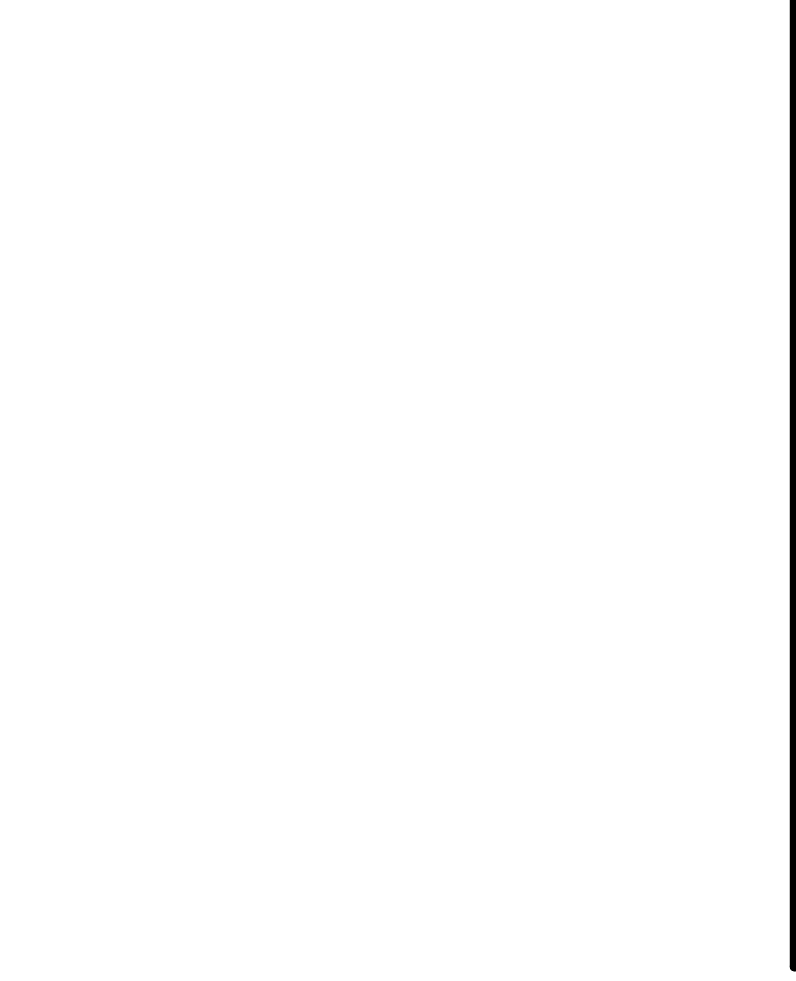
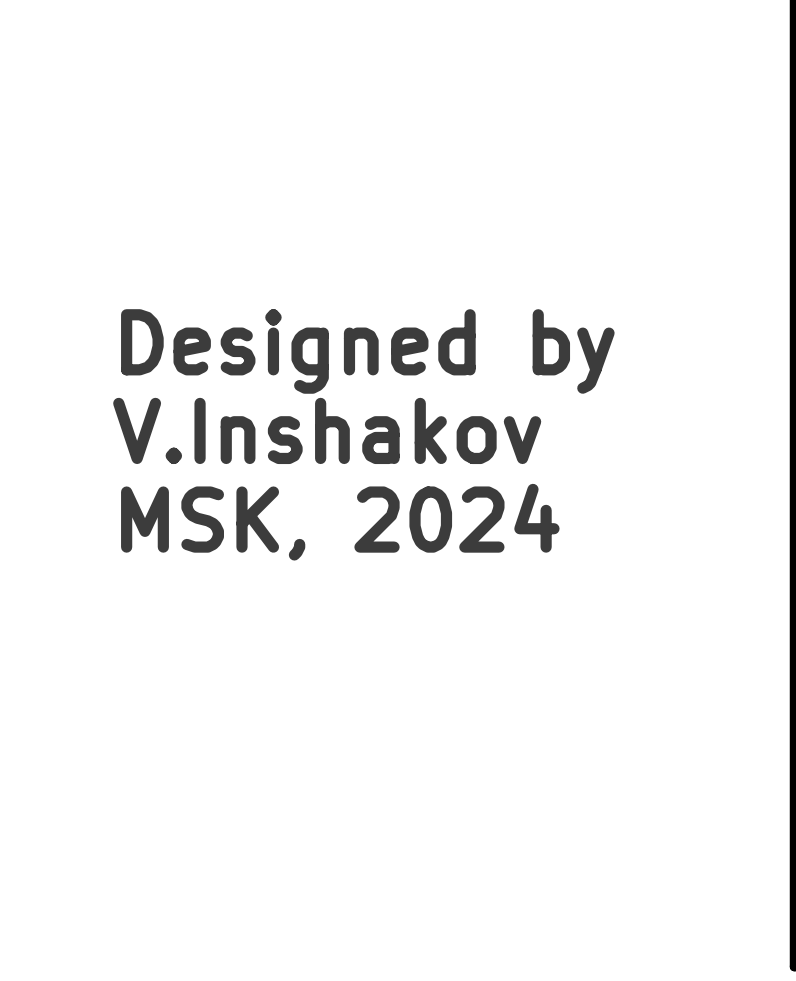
text: none -> Designed by (367, 351)
text: none -> V.Inshakov (327, 430)
text: none -> MSK, 2024 (340, 522)

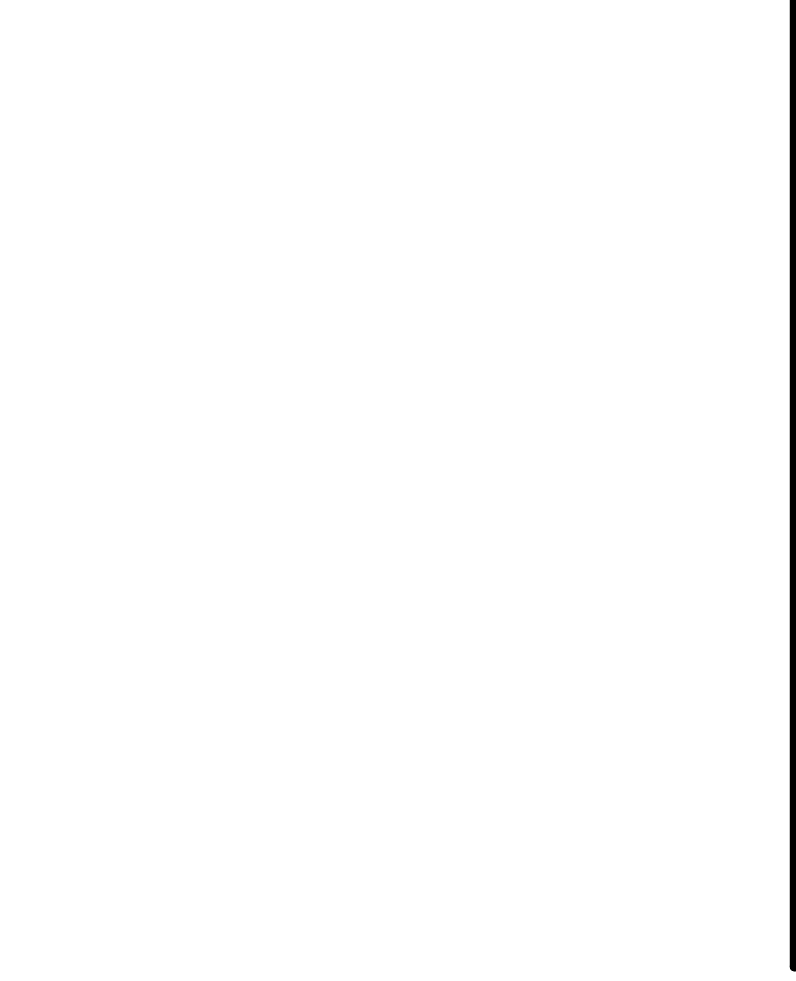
text: Designed by (367, 351) -> none
text: V.Inshakov (327, 430) -> none
text: MSK, 2024 (340, 522) -> none

